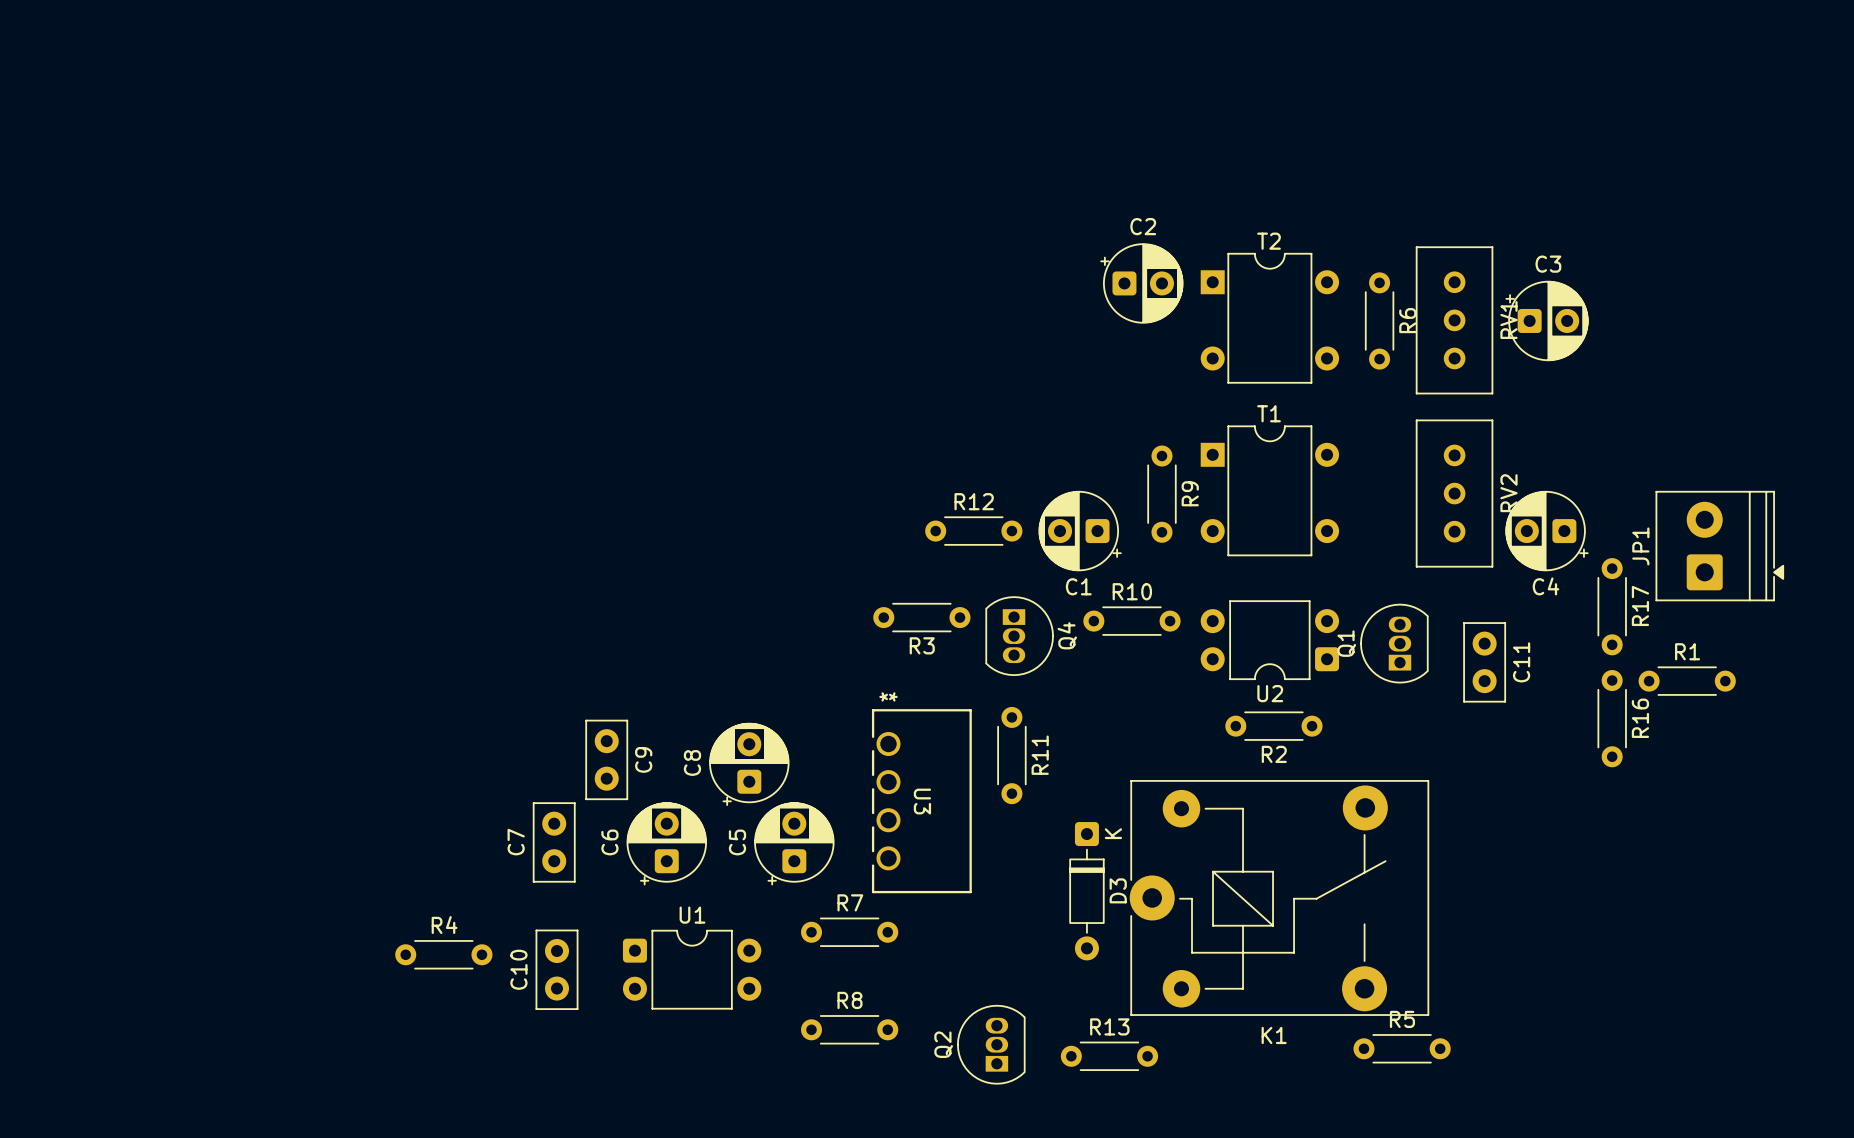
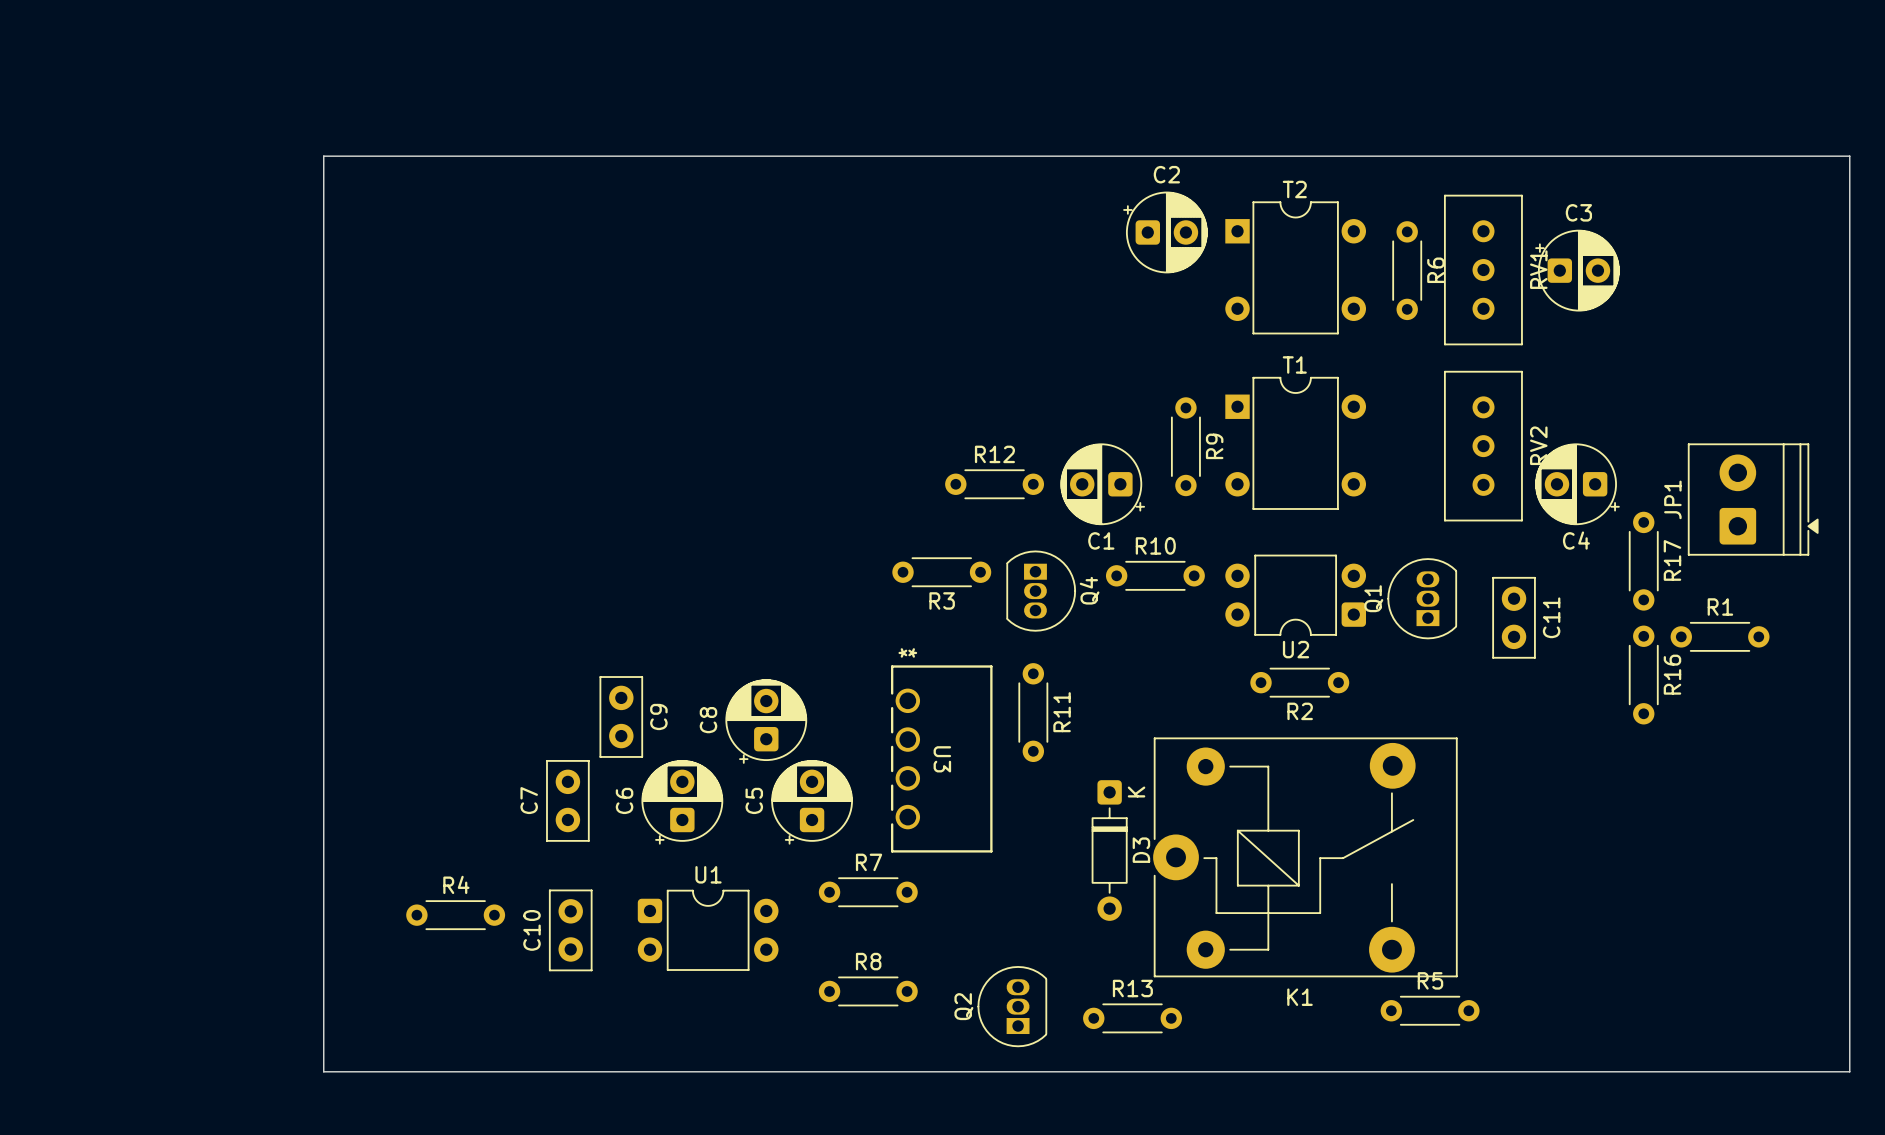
board edge: none -> (323, 156) (1849, 156) (1849, 1071) (323, 1071) (323, 156)

